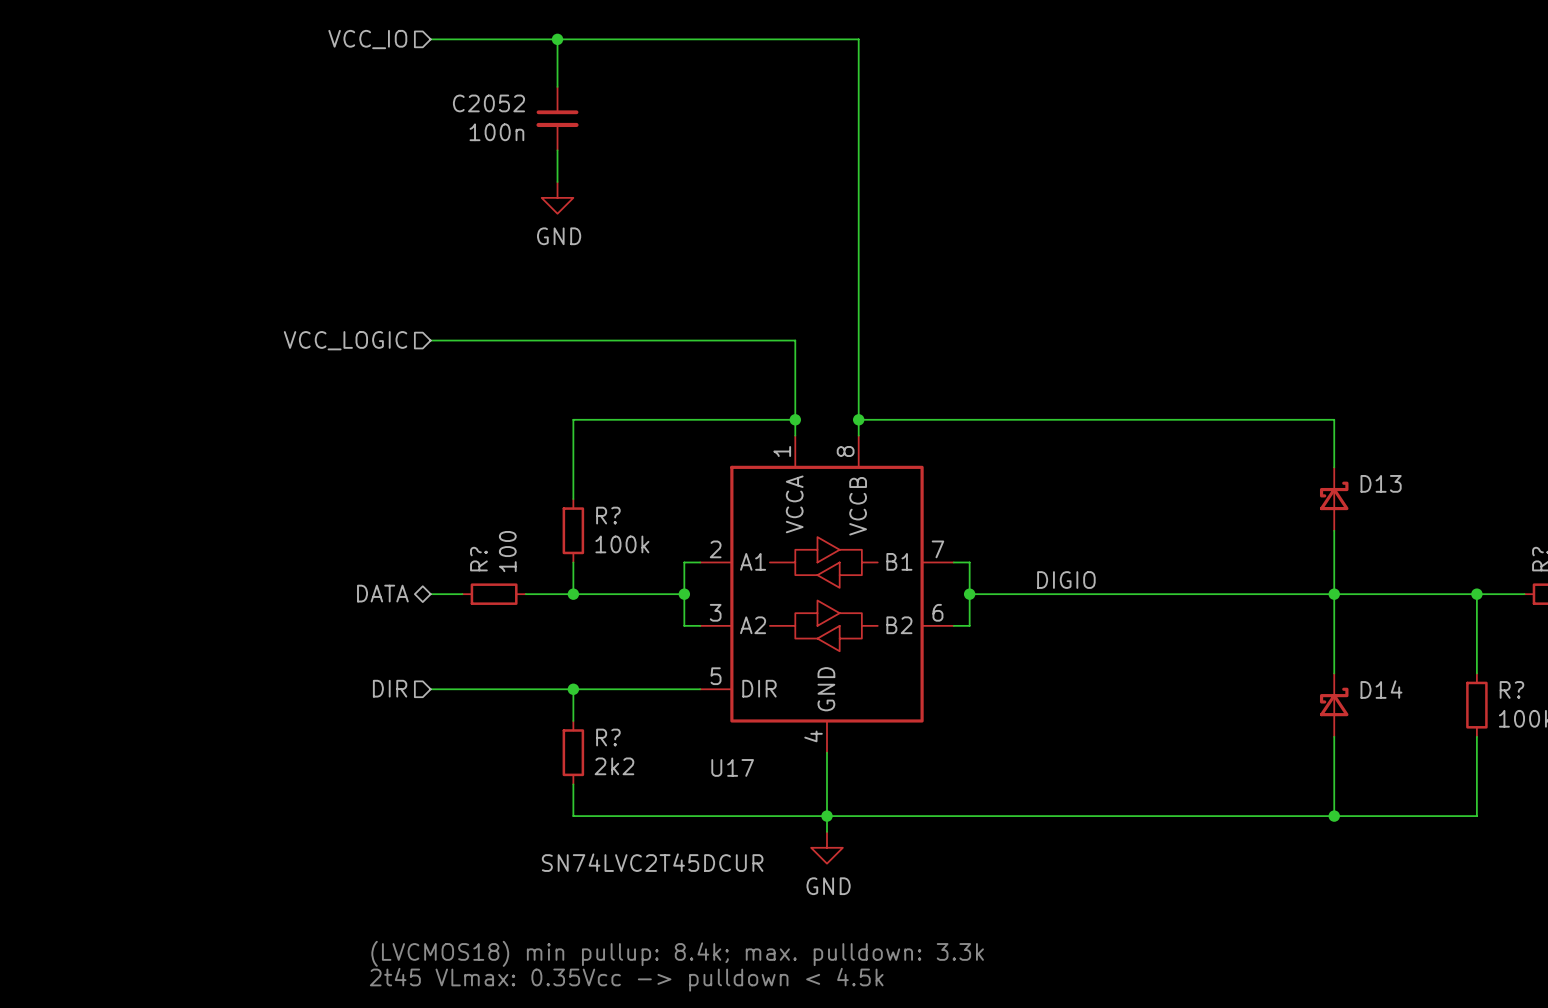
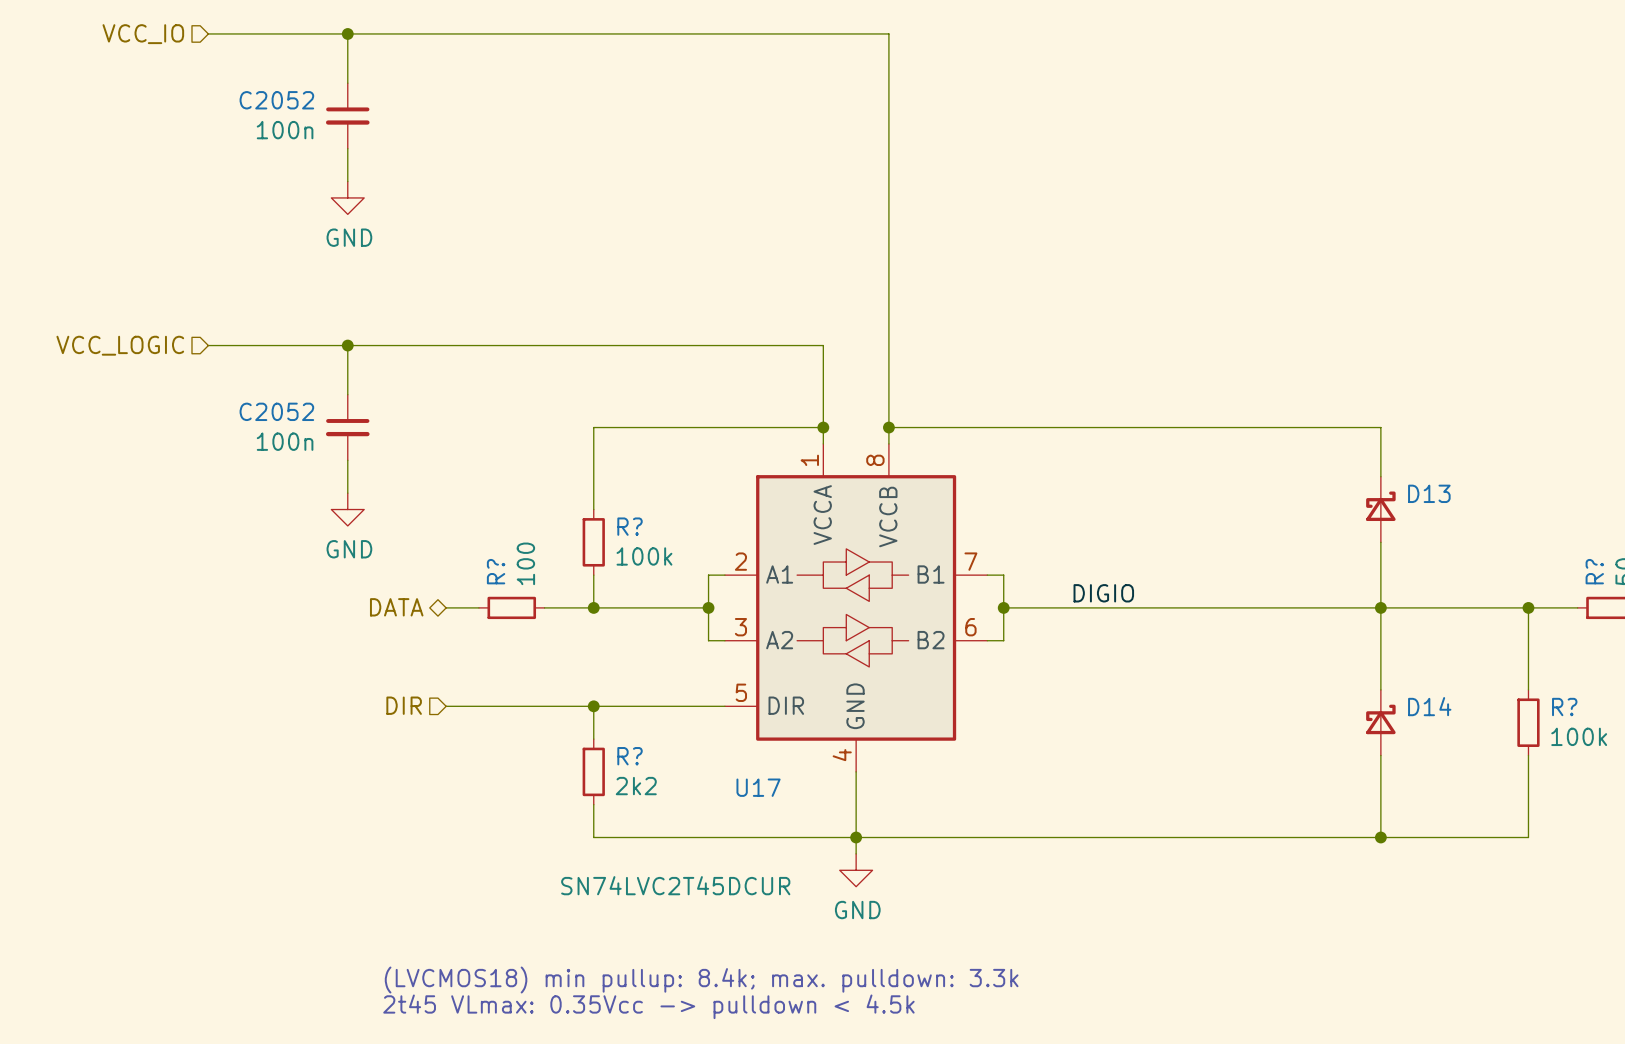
wire: none -> (208, 33) (446, 33)
junction: none -> (347, 33)
hierarchical label position: VCC_IO (367, 39) -> VCC_IO (143, 34)
wire: (557, 39) (557, 86) -> (347, 33) (347, 83)
junction: (557, 39) -> none
C2052: none -> 100n (347, 115)
C2052: 100n (557, 118) -> none
wire: (557, 150) (557, 182) -> (347, 148) (347, 181)
power symbol: none -> GND (347, 197)
power symbol: GND (557, 197) -> none
wire: none -> (208, 345) (446, 345)
wire: none -> (347, 345) (347, 394)
junction: none -> (347, 345)
hierarchical label position: VCC_LOGIC (345, 340) -> VCC_LOGIC (120, 345)
C2052: none -> 100n (347, 427)
wire: none -> (347, 460) (347, 493)
power symbol: none -> GND (347, 509)

